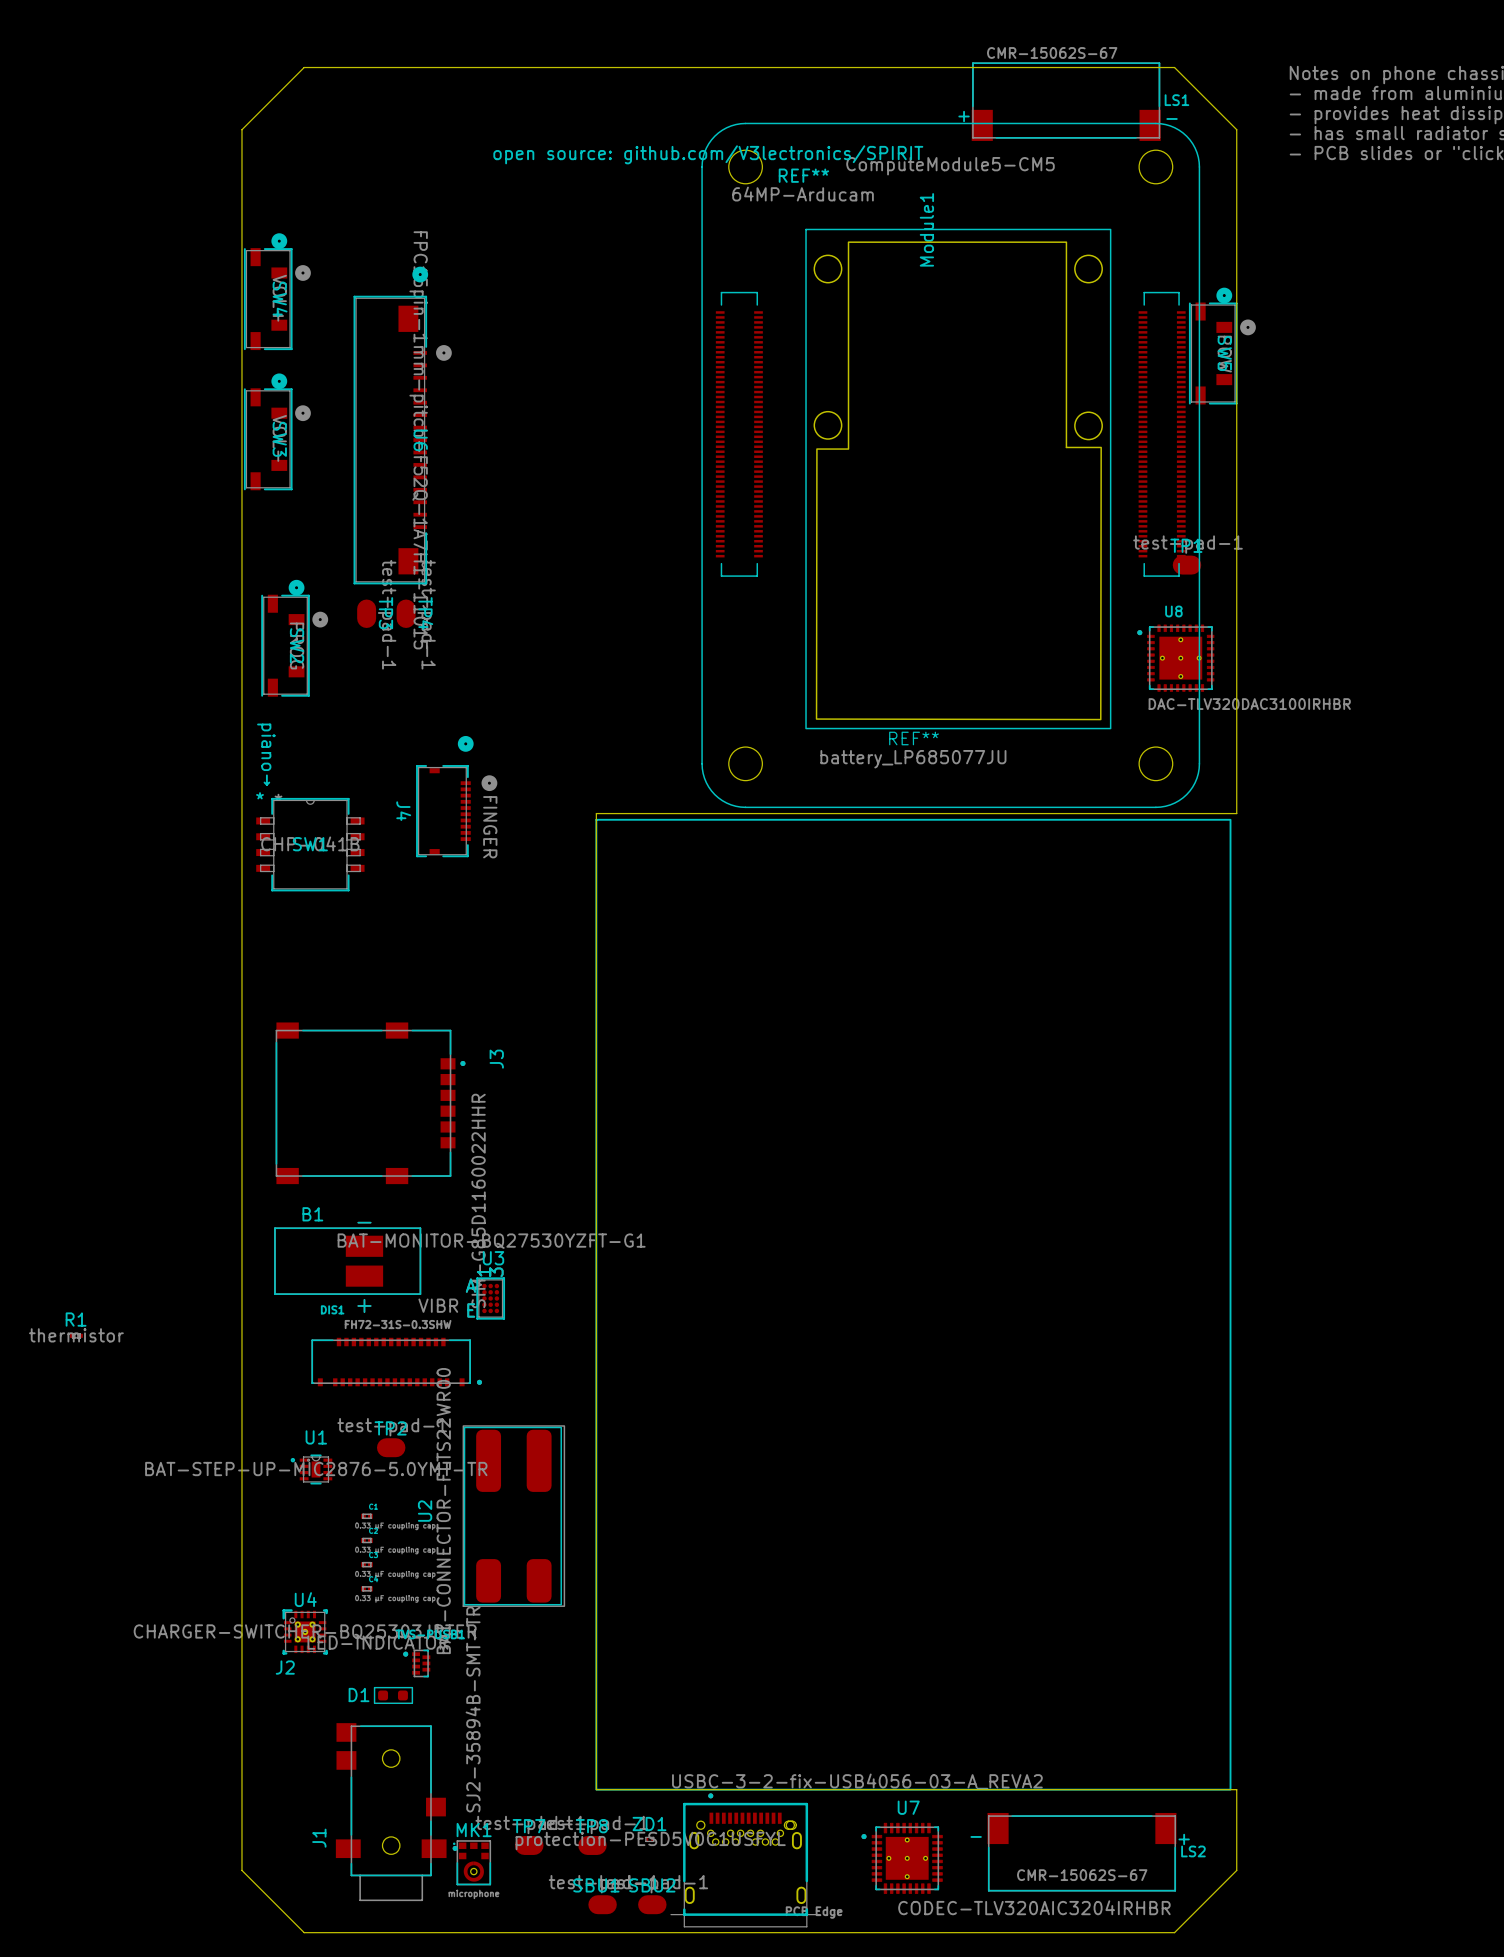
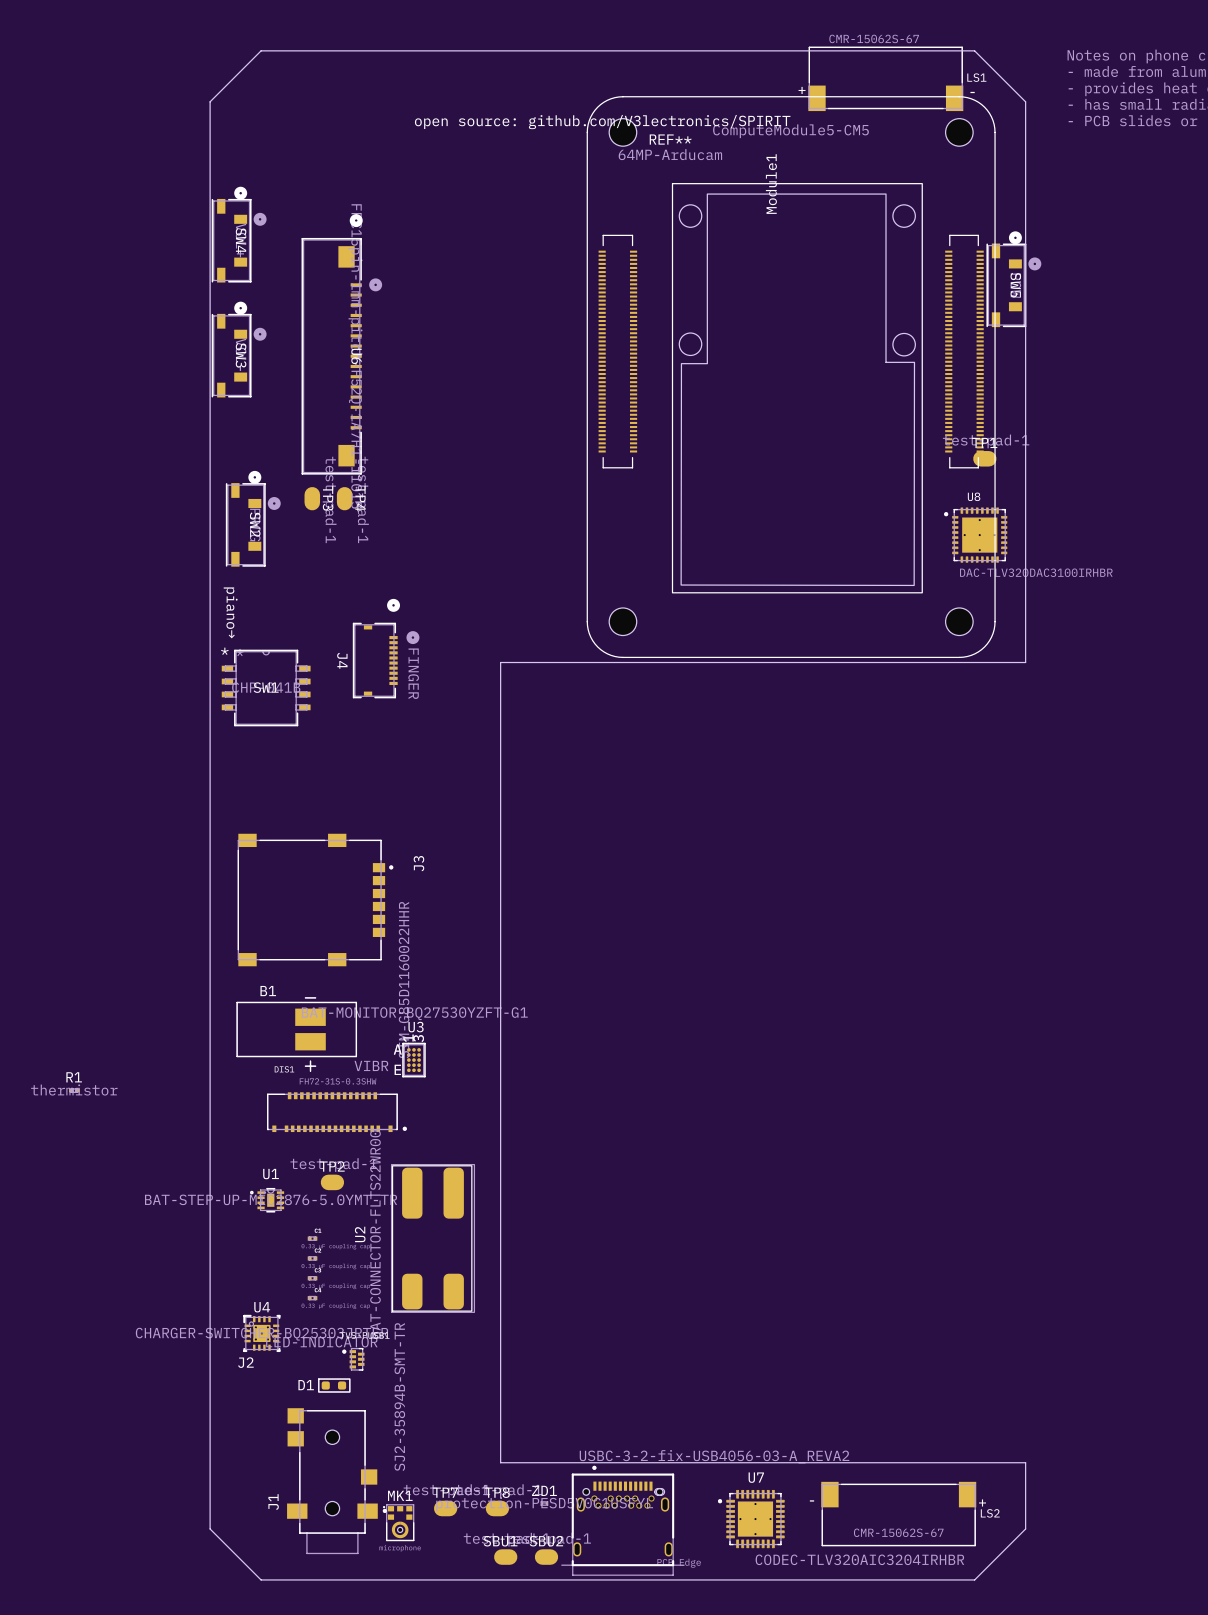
REF**: battery_LP685077JU (913, 1304) -> none

